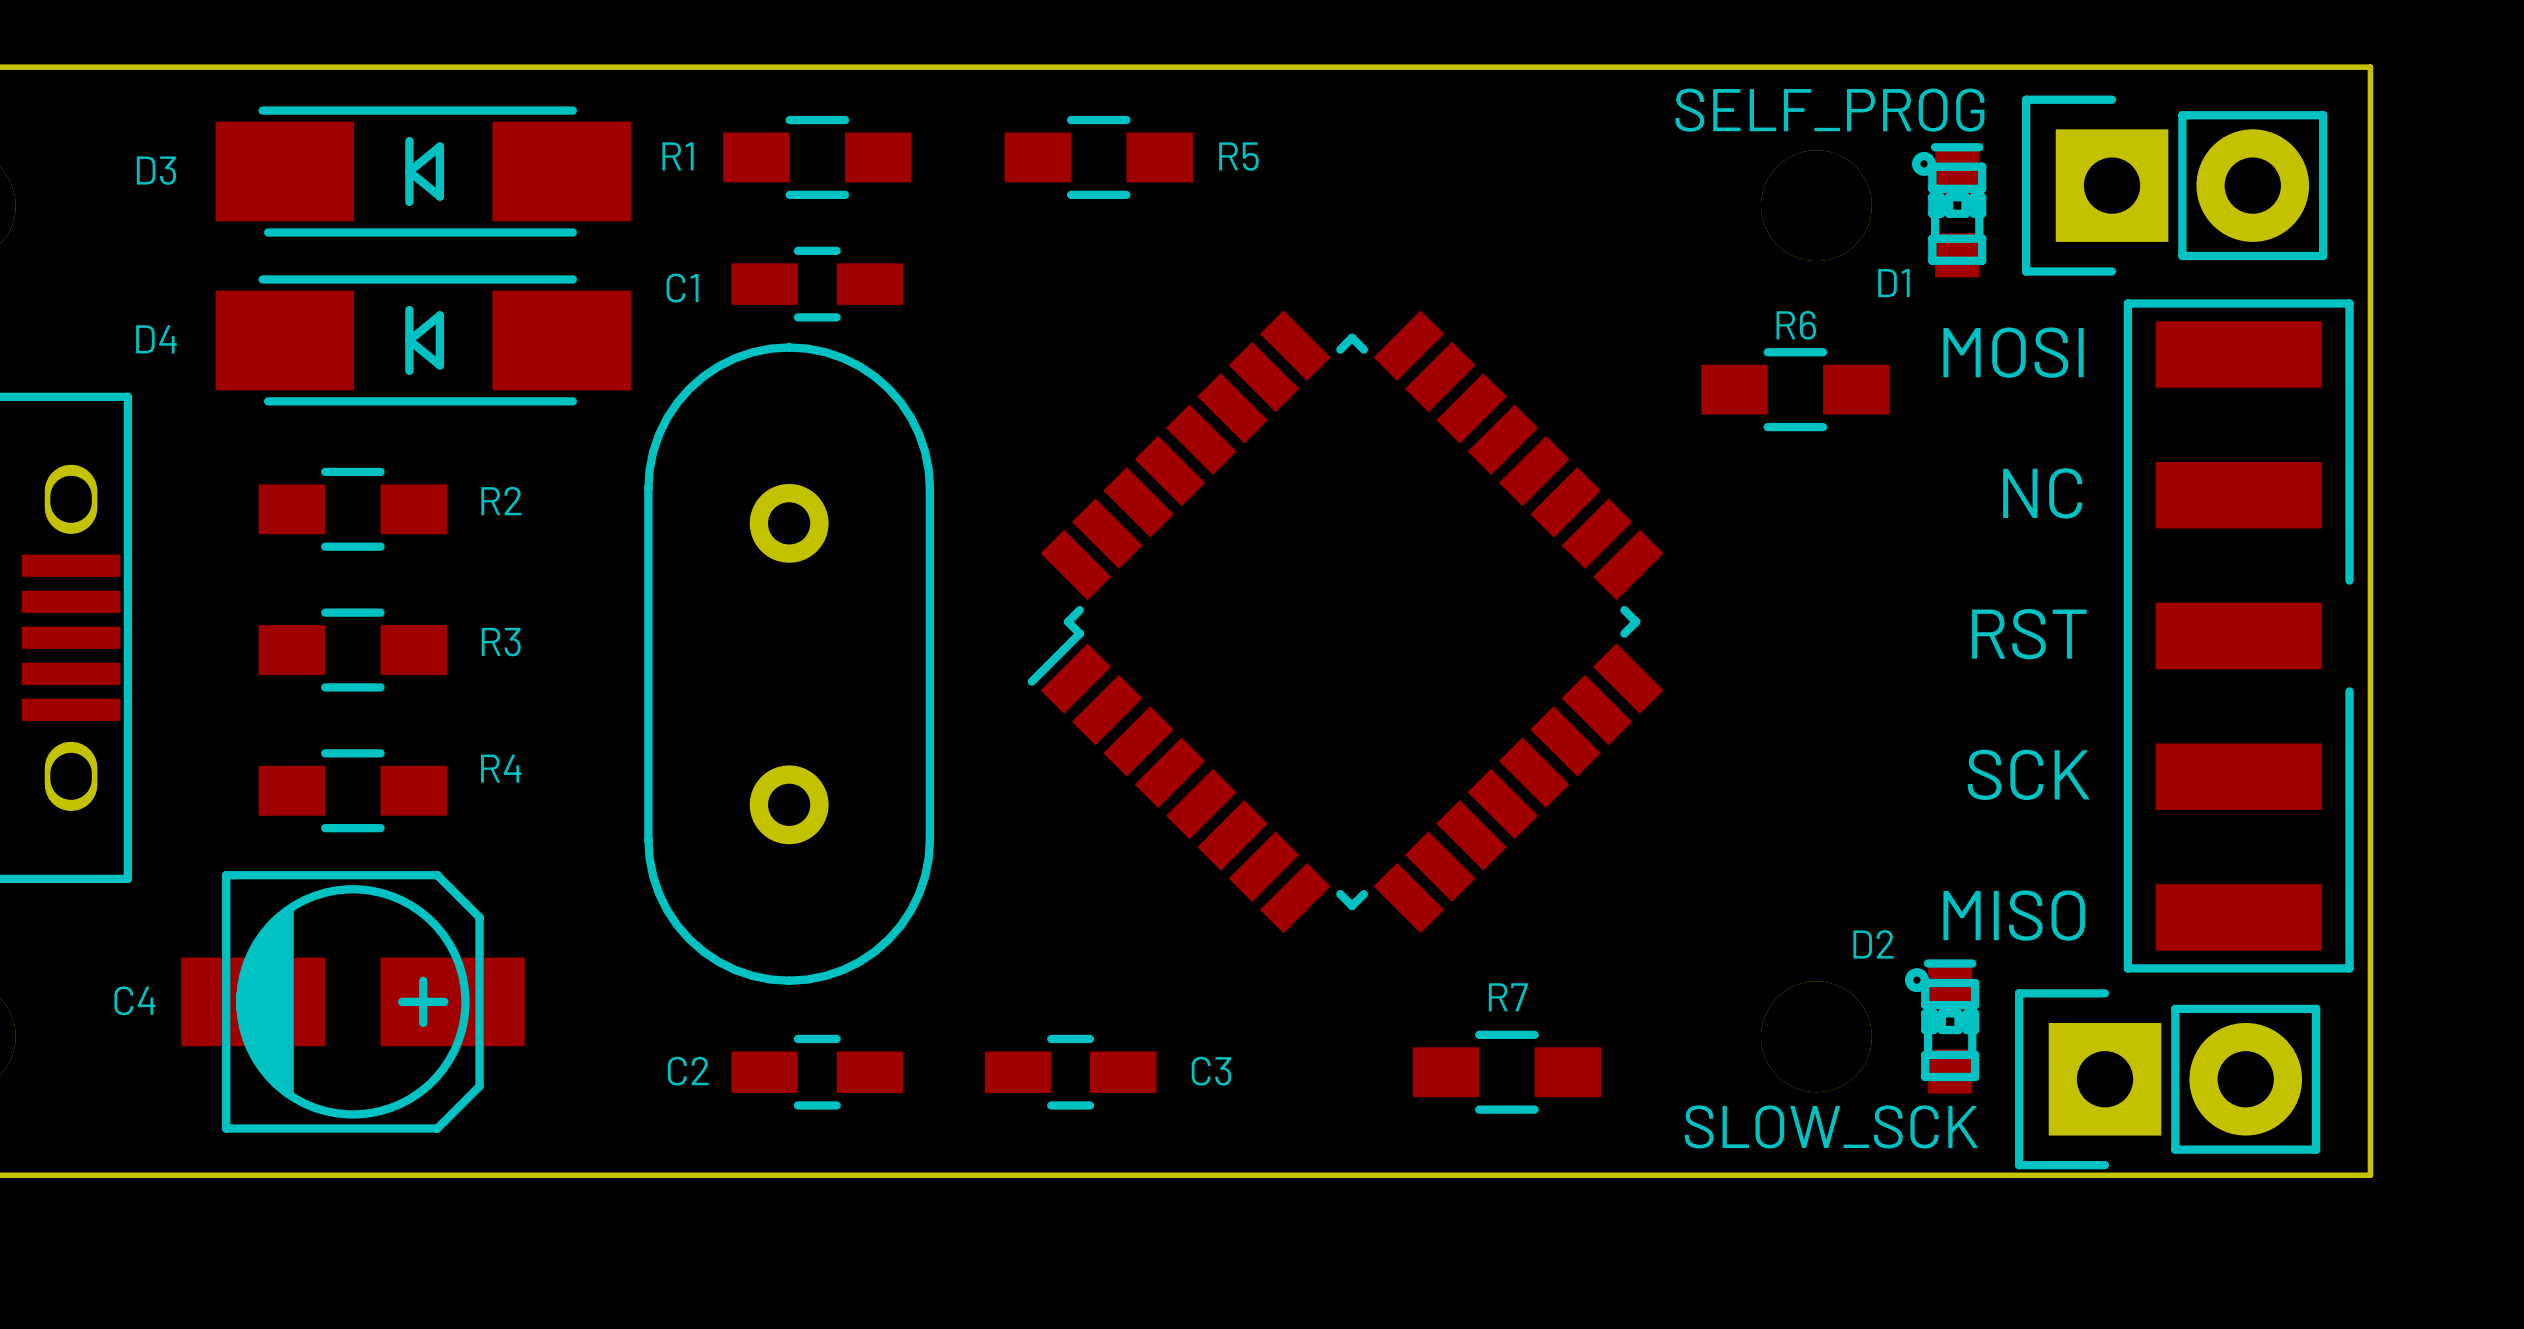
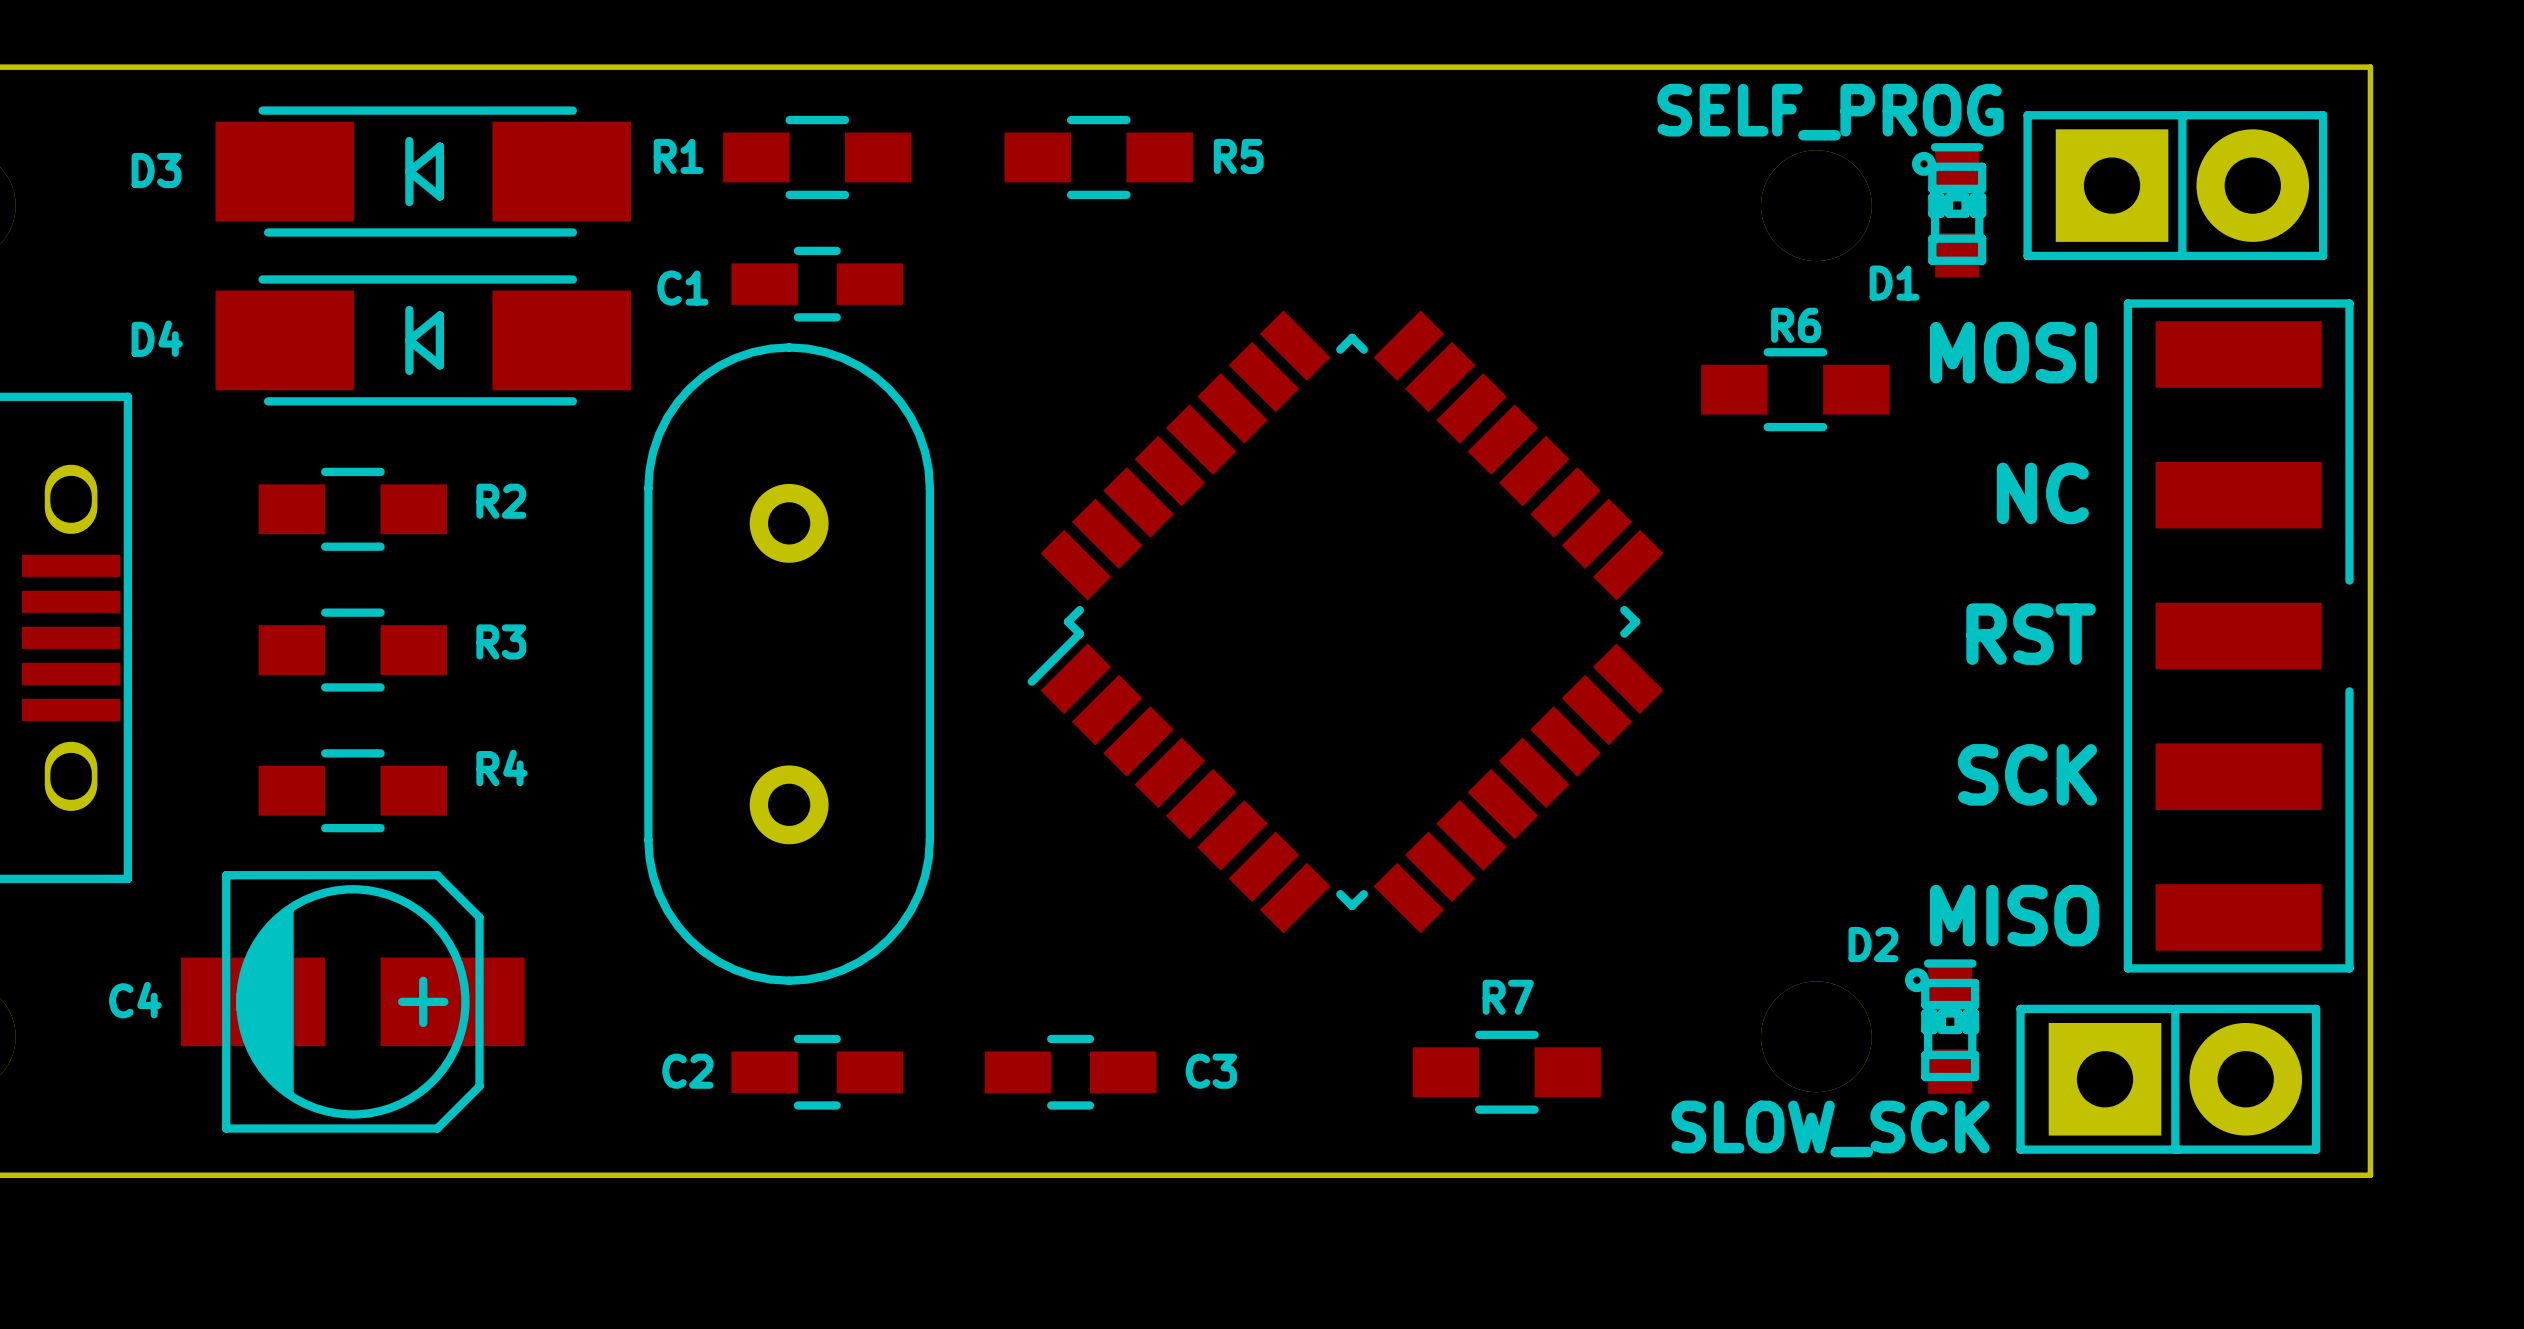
part footprint: [2022, 95, 2328, 276] -> [2023, 111, 2328, 261]
part footprint: [2014, 989, 2321, 1170] -> [2016, 1004, 2321, 1154]

